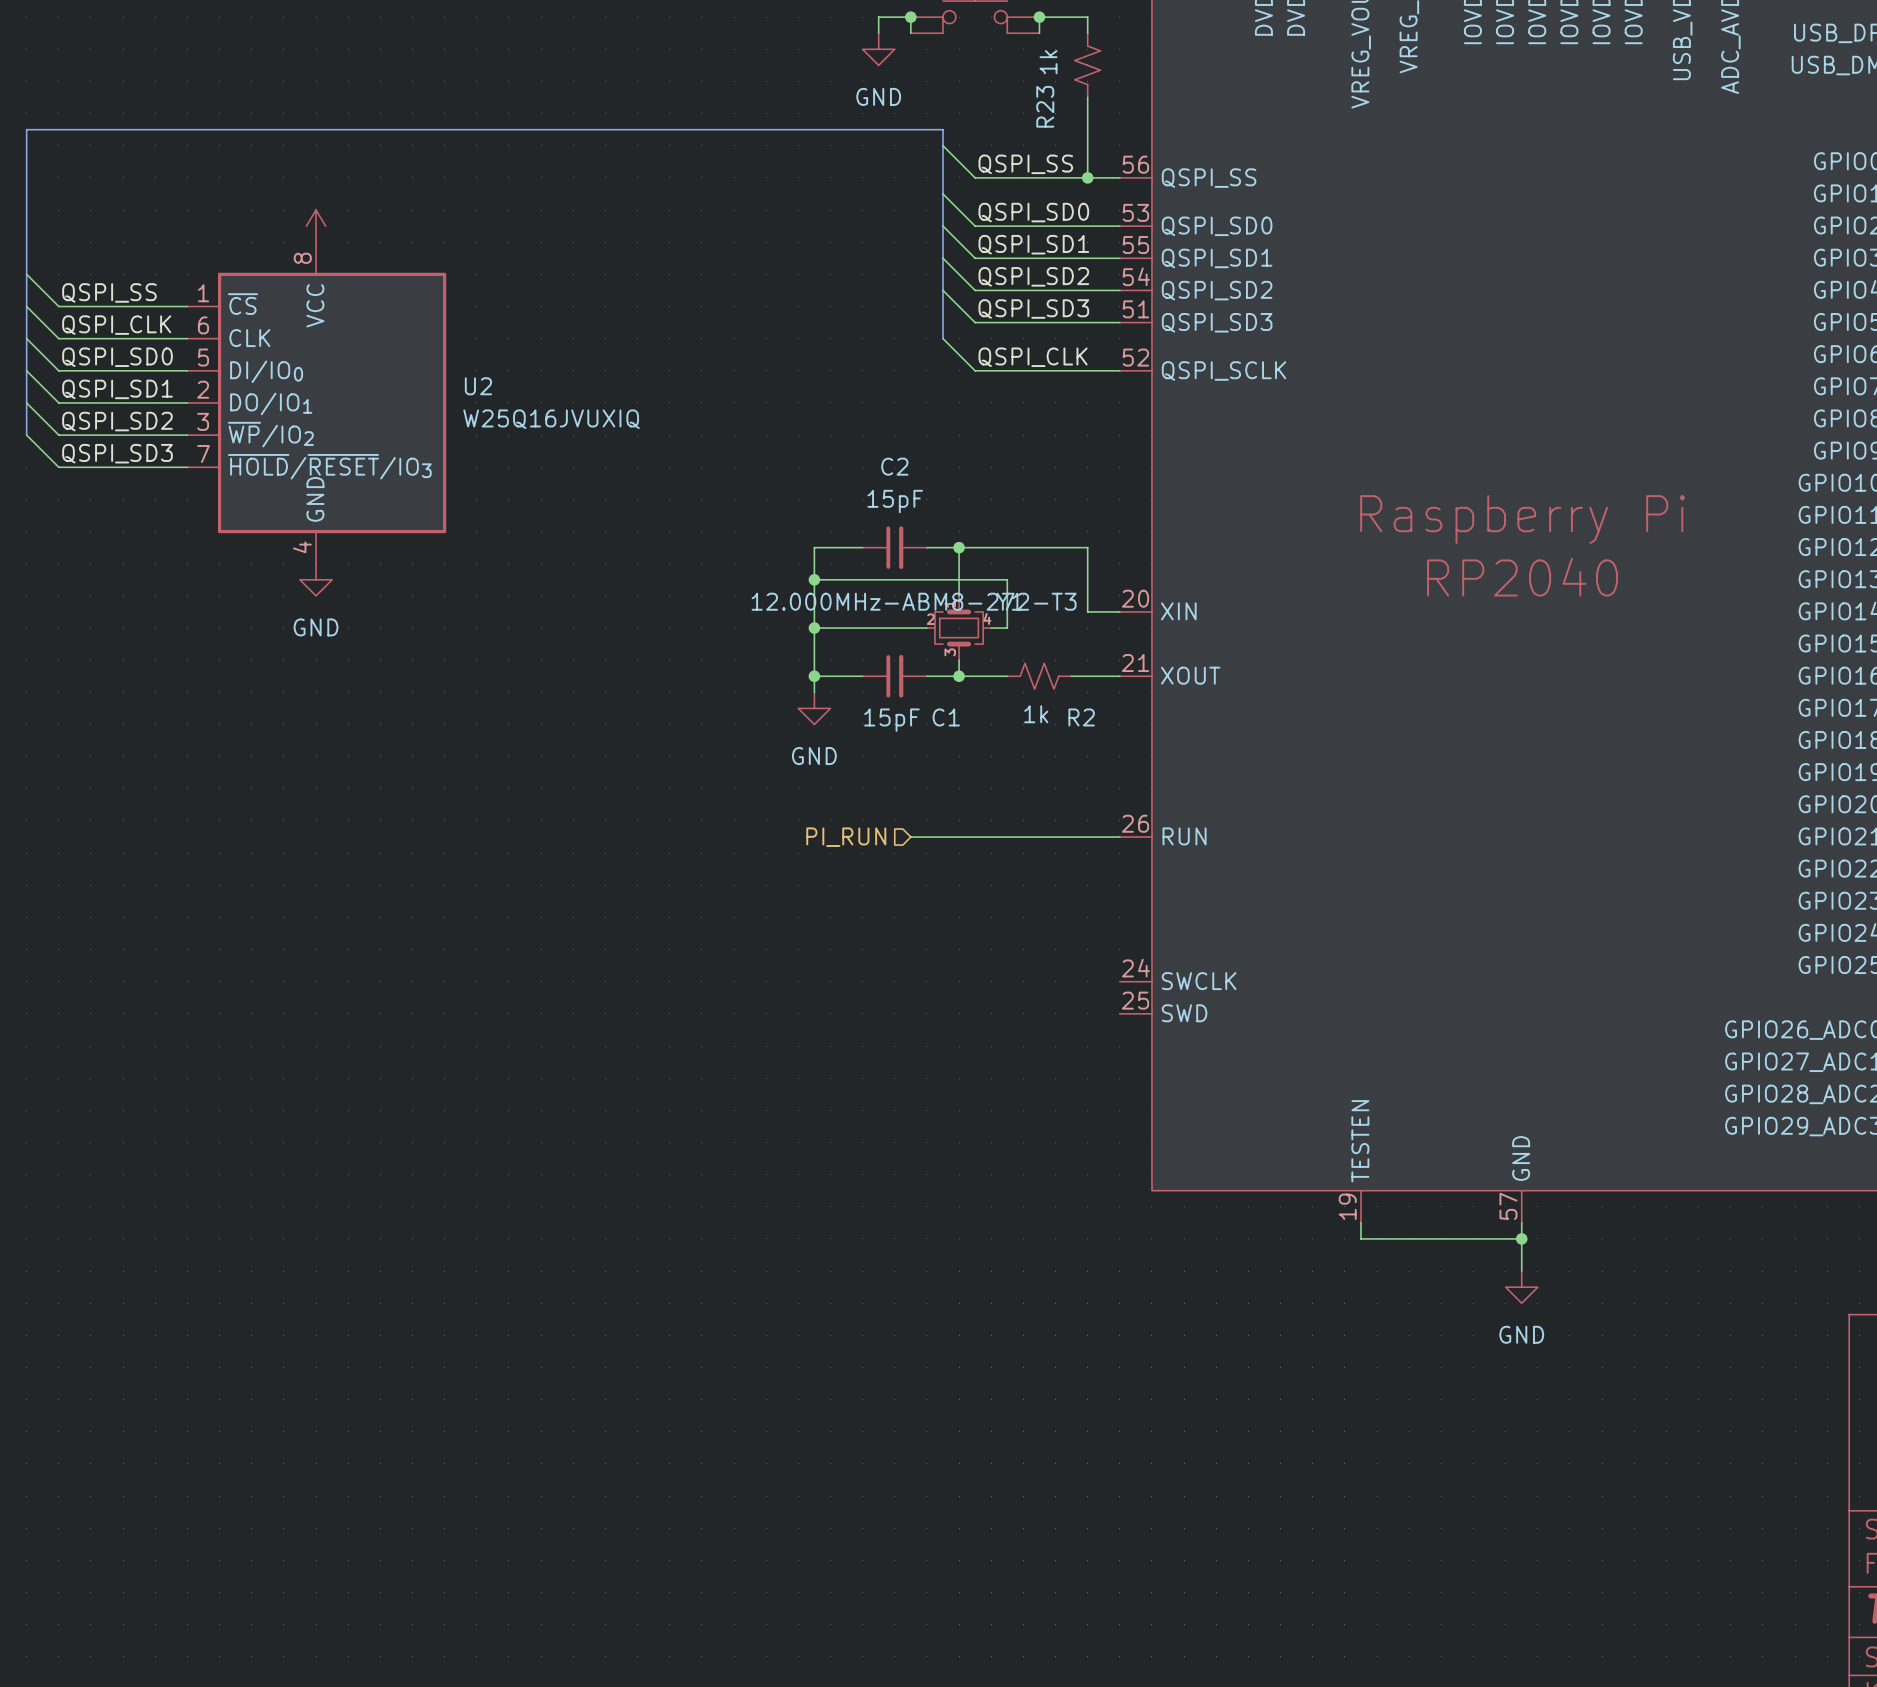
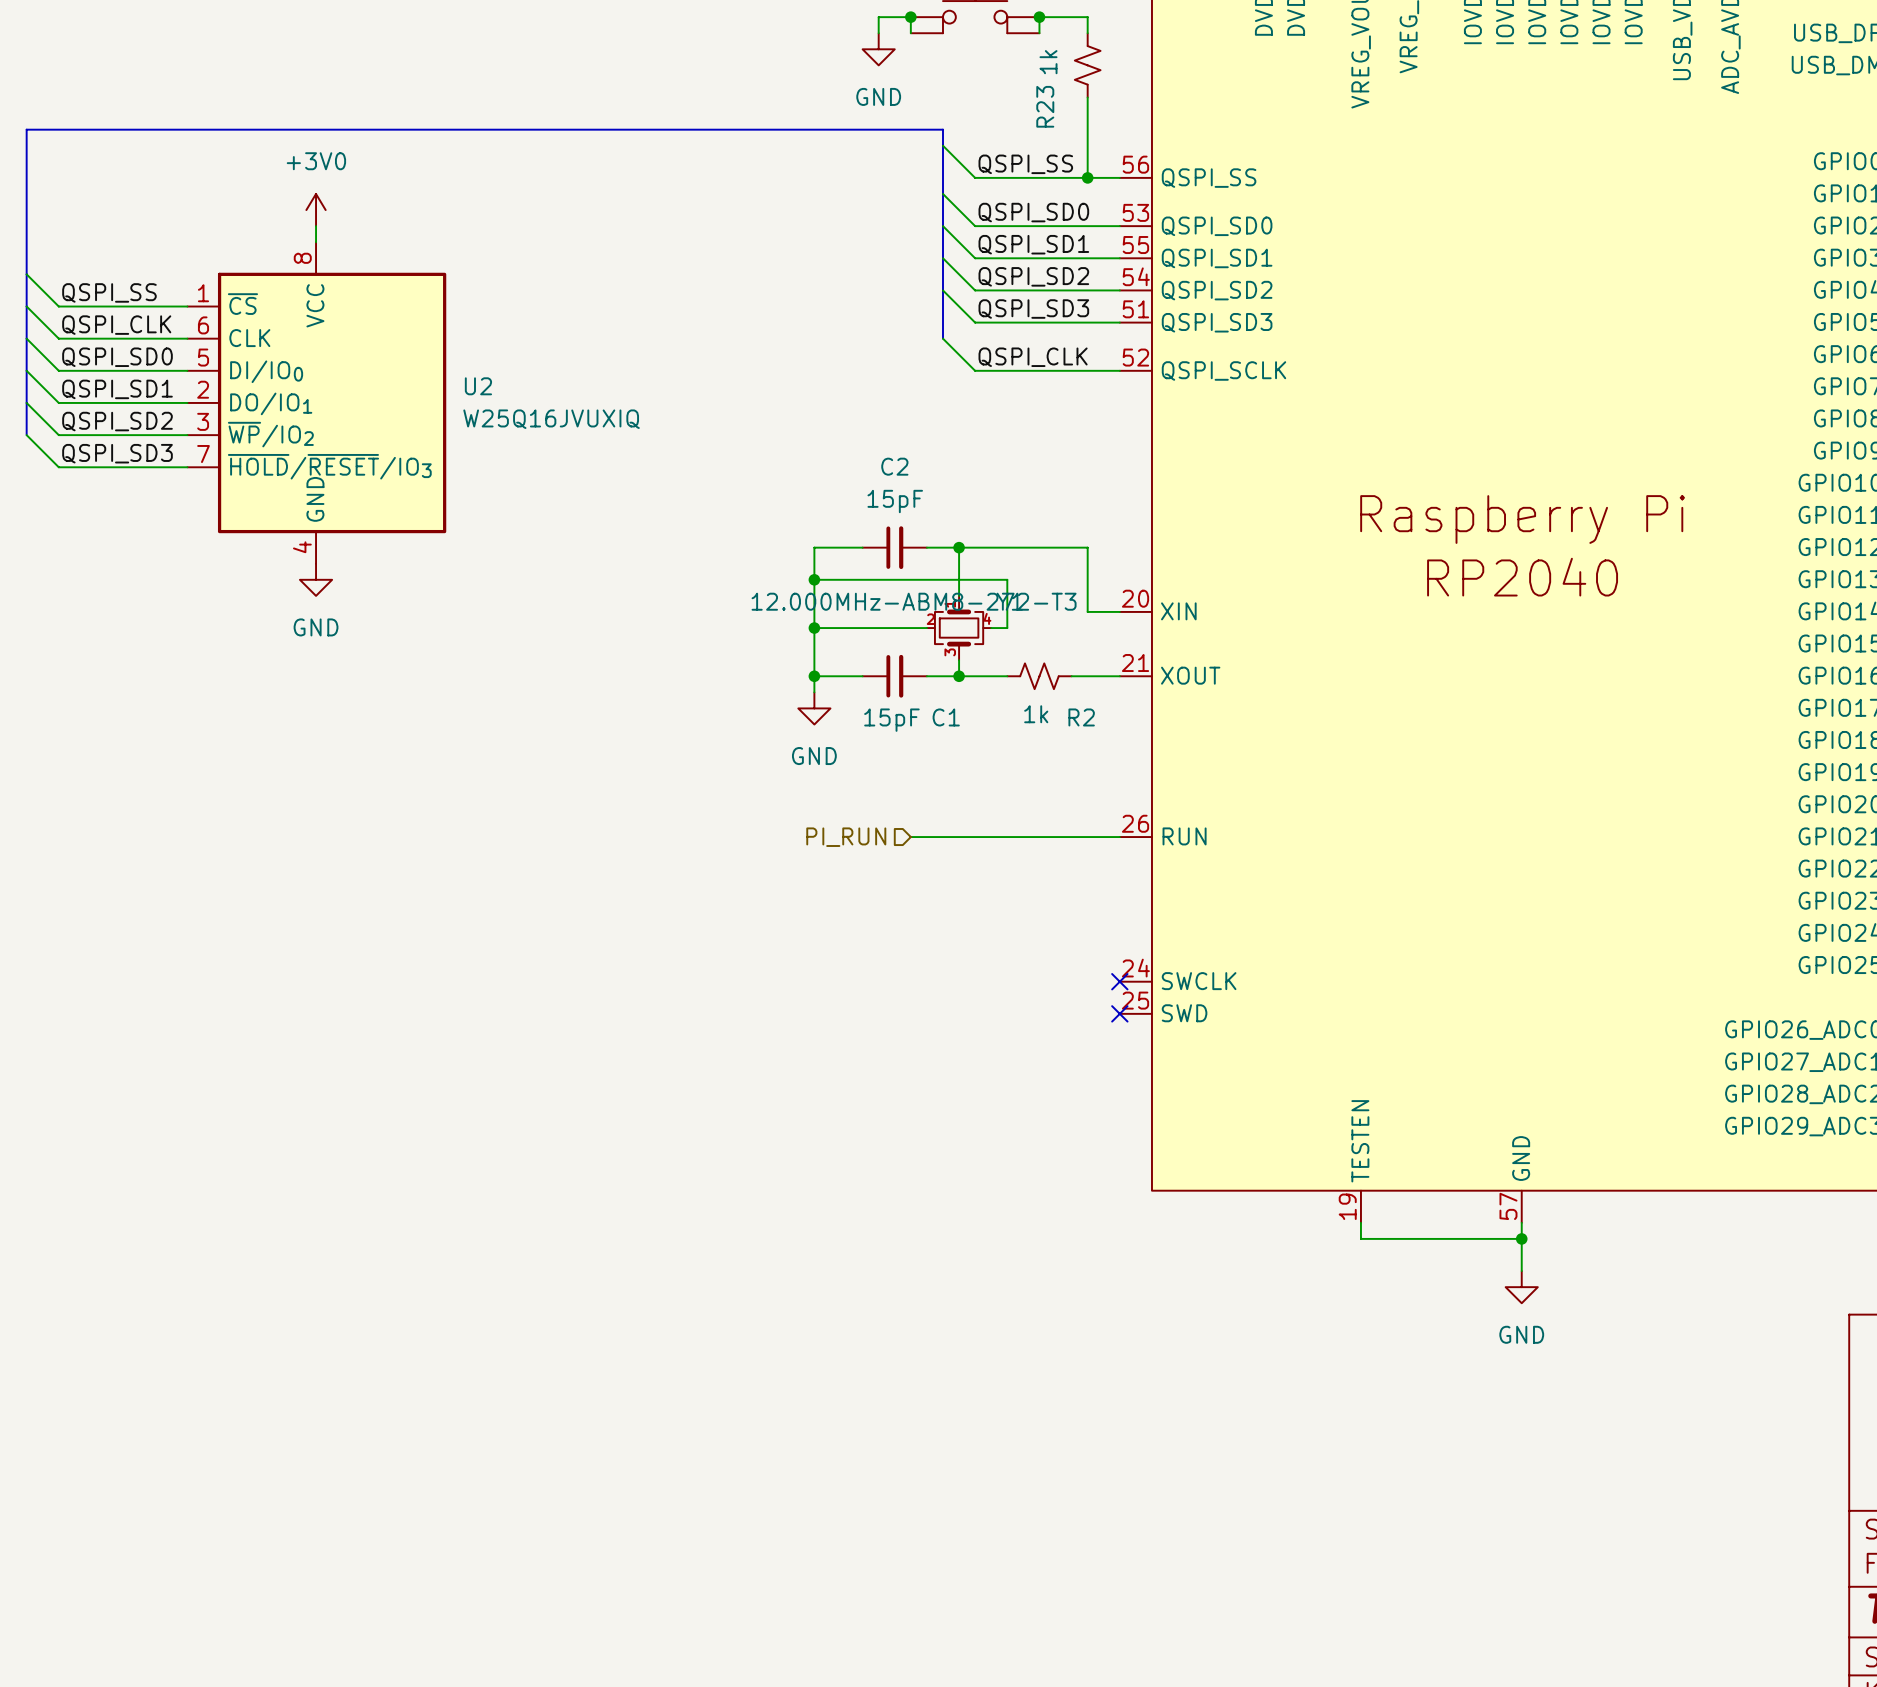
power symbol: none -> +3V0 (316, 210)
power symbol: (316, 226) -> none
no-connect mark: none -> (1119, 981)
no-connect mark: none -> (1119, 1013)

